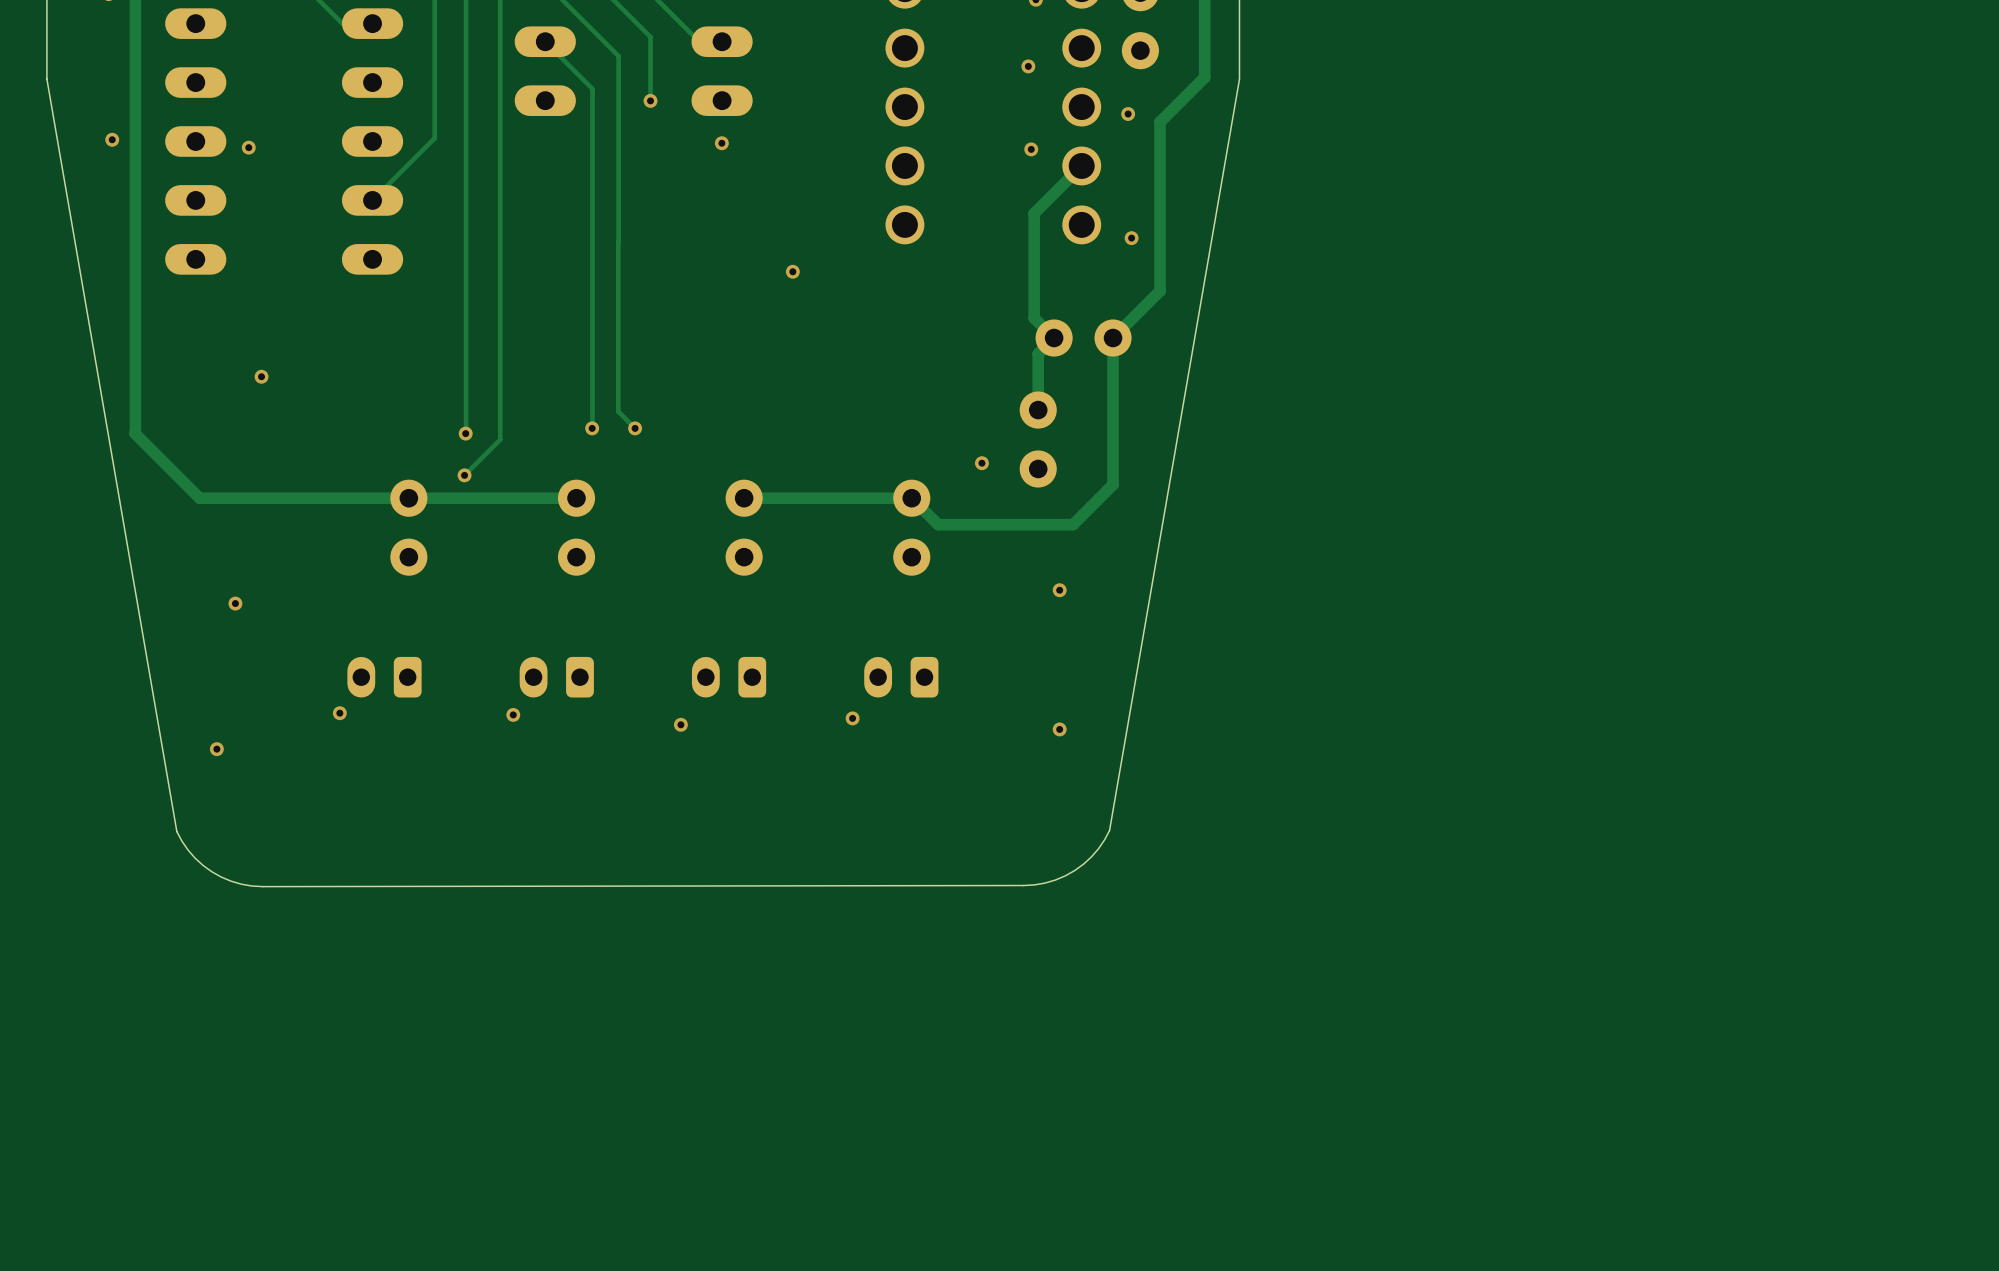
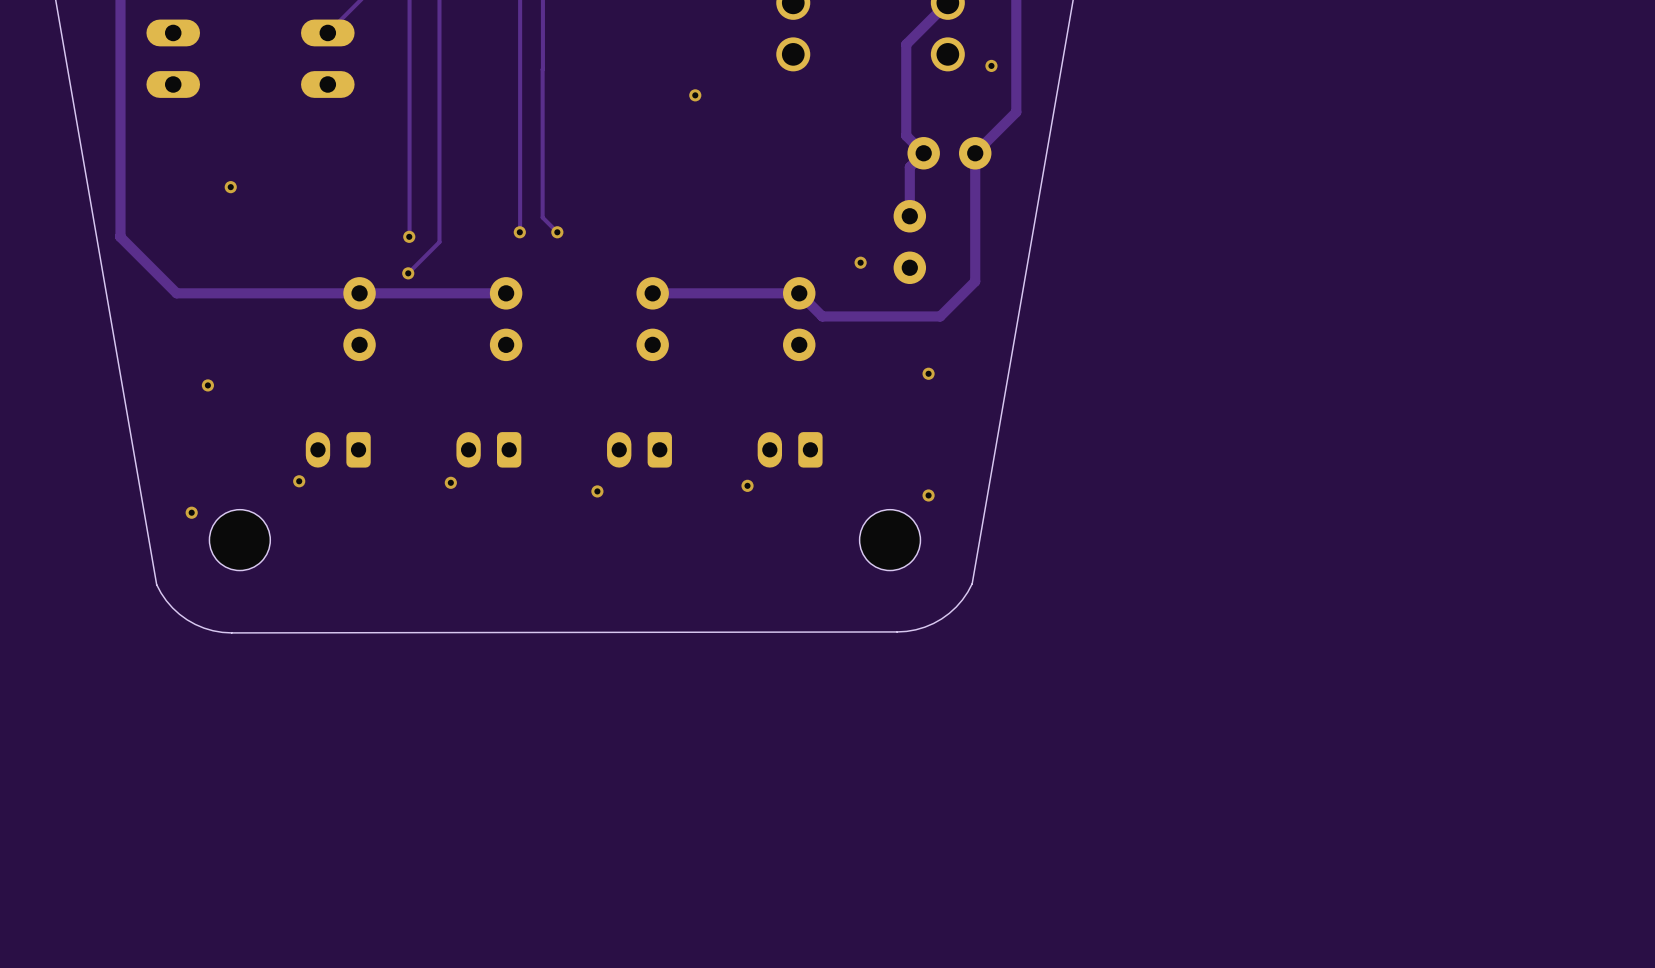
part: none -> (239, 540)
part: none -> (890, 540)

